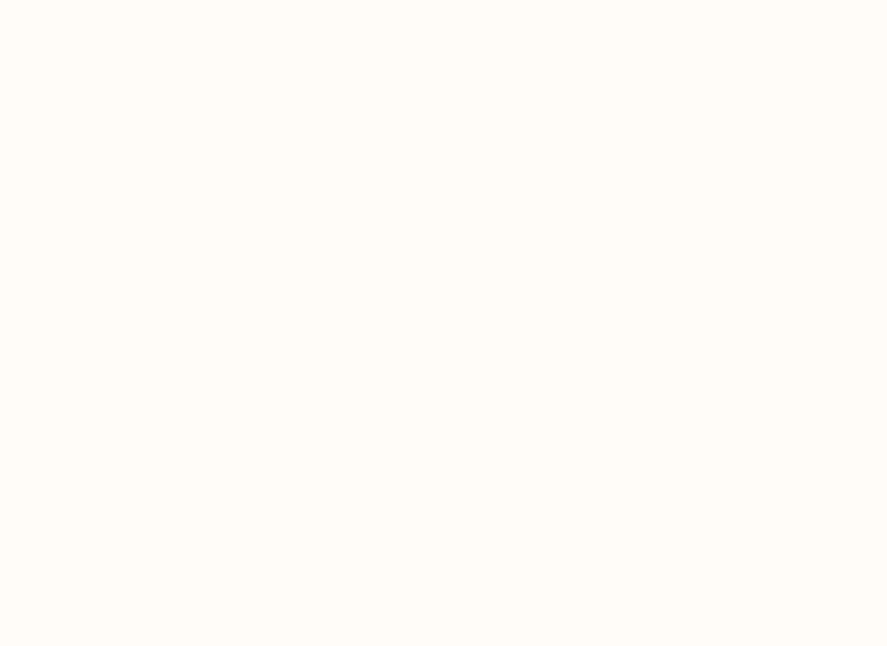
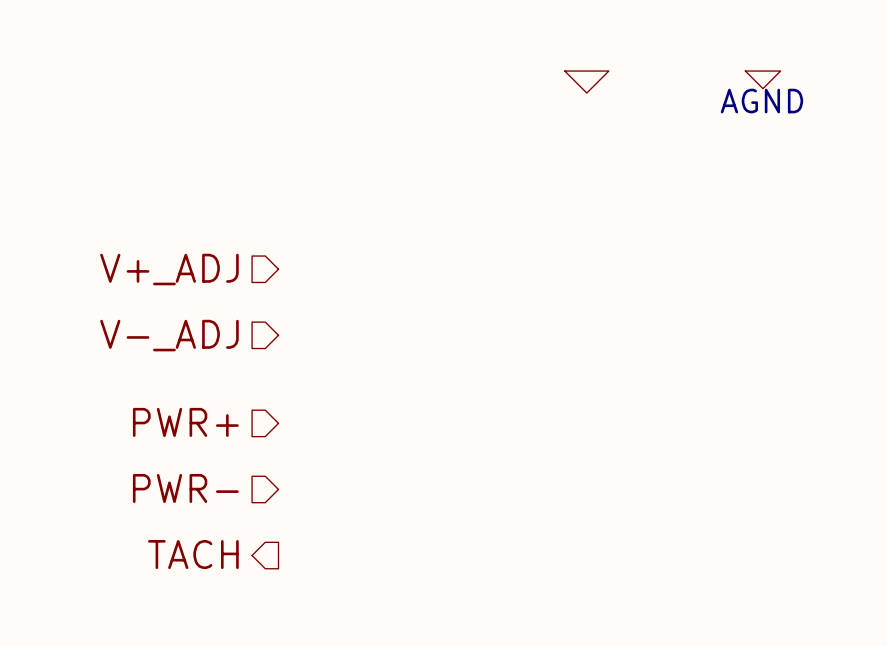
power symbol: none -> AGND (762, 79)
power symbol: none -> (586, 82)
hierarchical label: none -> V+_ADJ (169, 269)
hierarchical label: none -> V-_ADJ (169, 335)
hierarchical label: none -> PWR+ (185, 422)
hierarchical label: none -> PWR- (185, 488)
hierarchical label: none -> TACH (193, 554)

